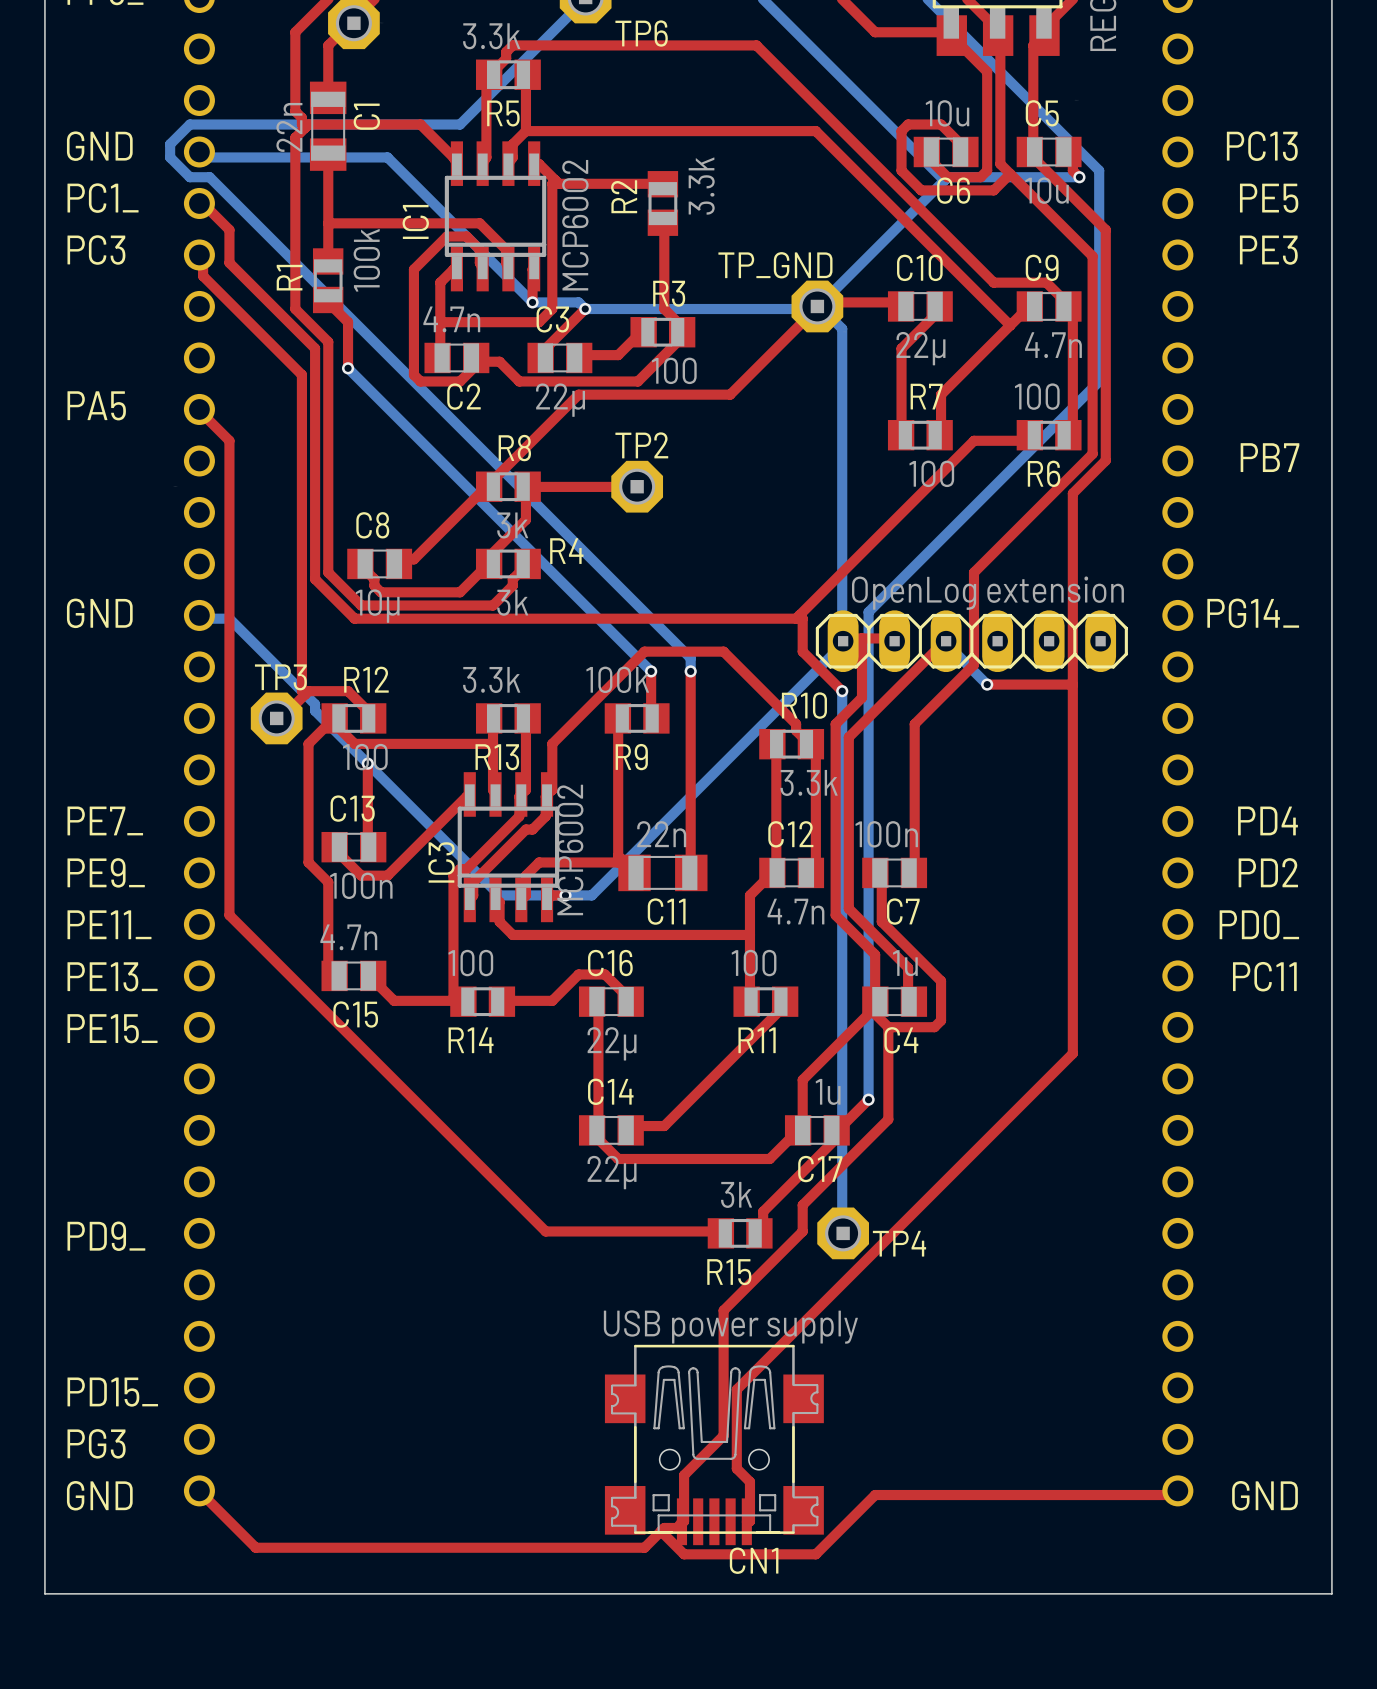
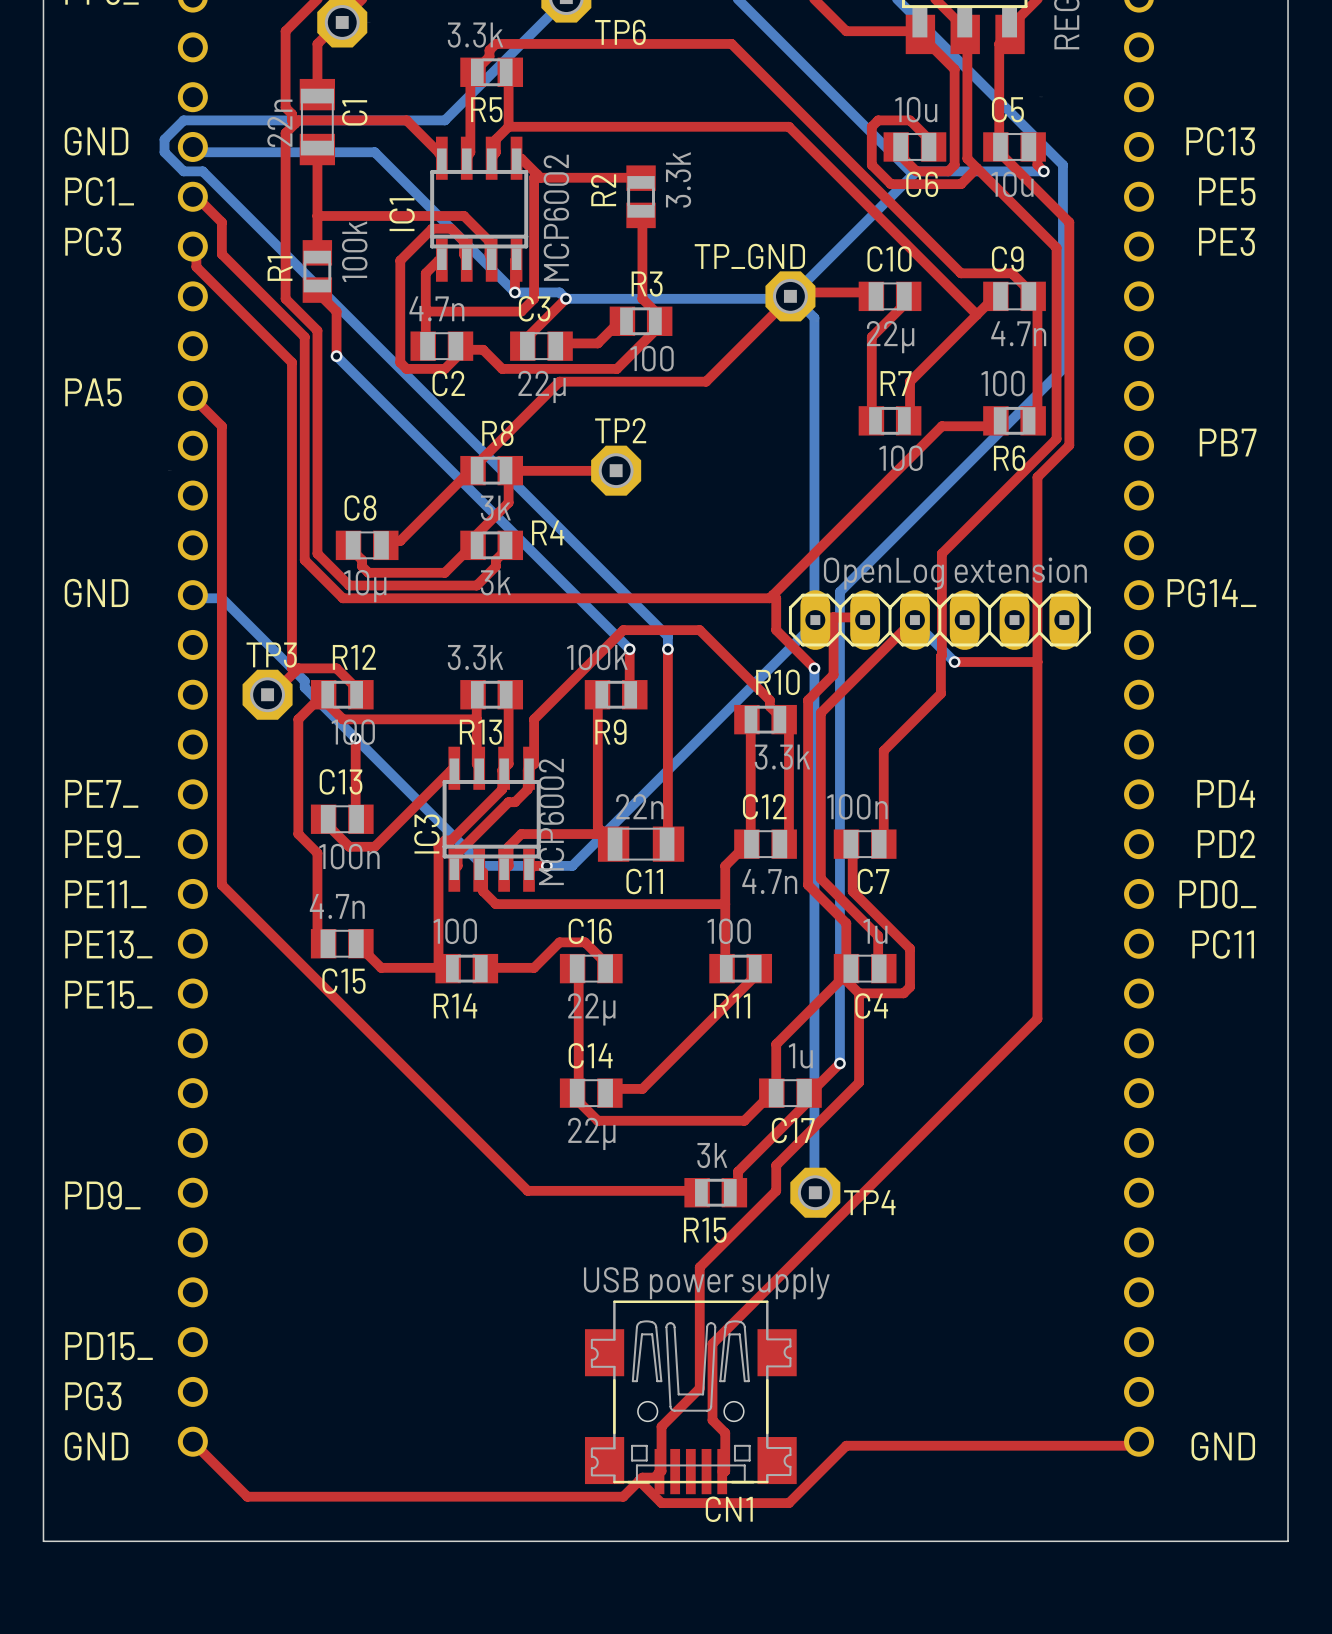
top track: (974, 664) (914, 724) (913, 872) -> (941, 642) (940, 693) (883, 750) (883, 844)

